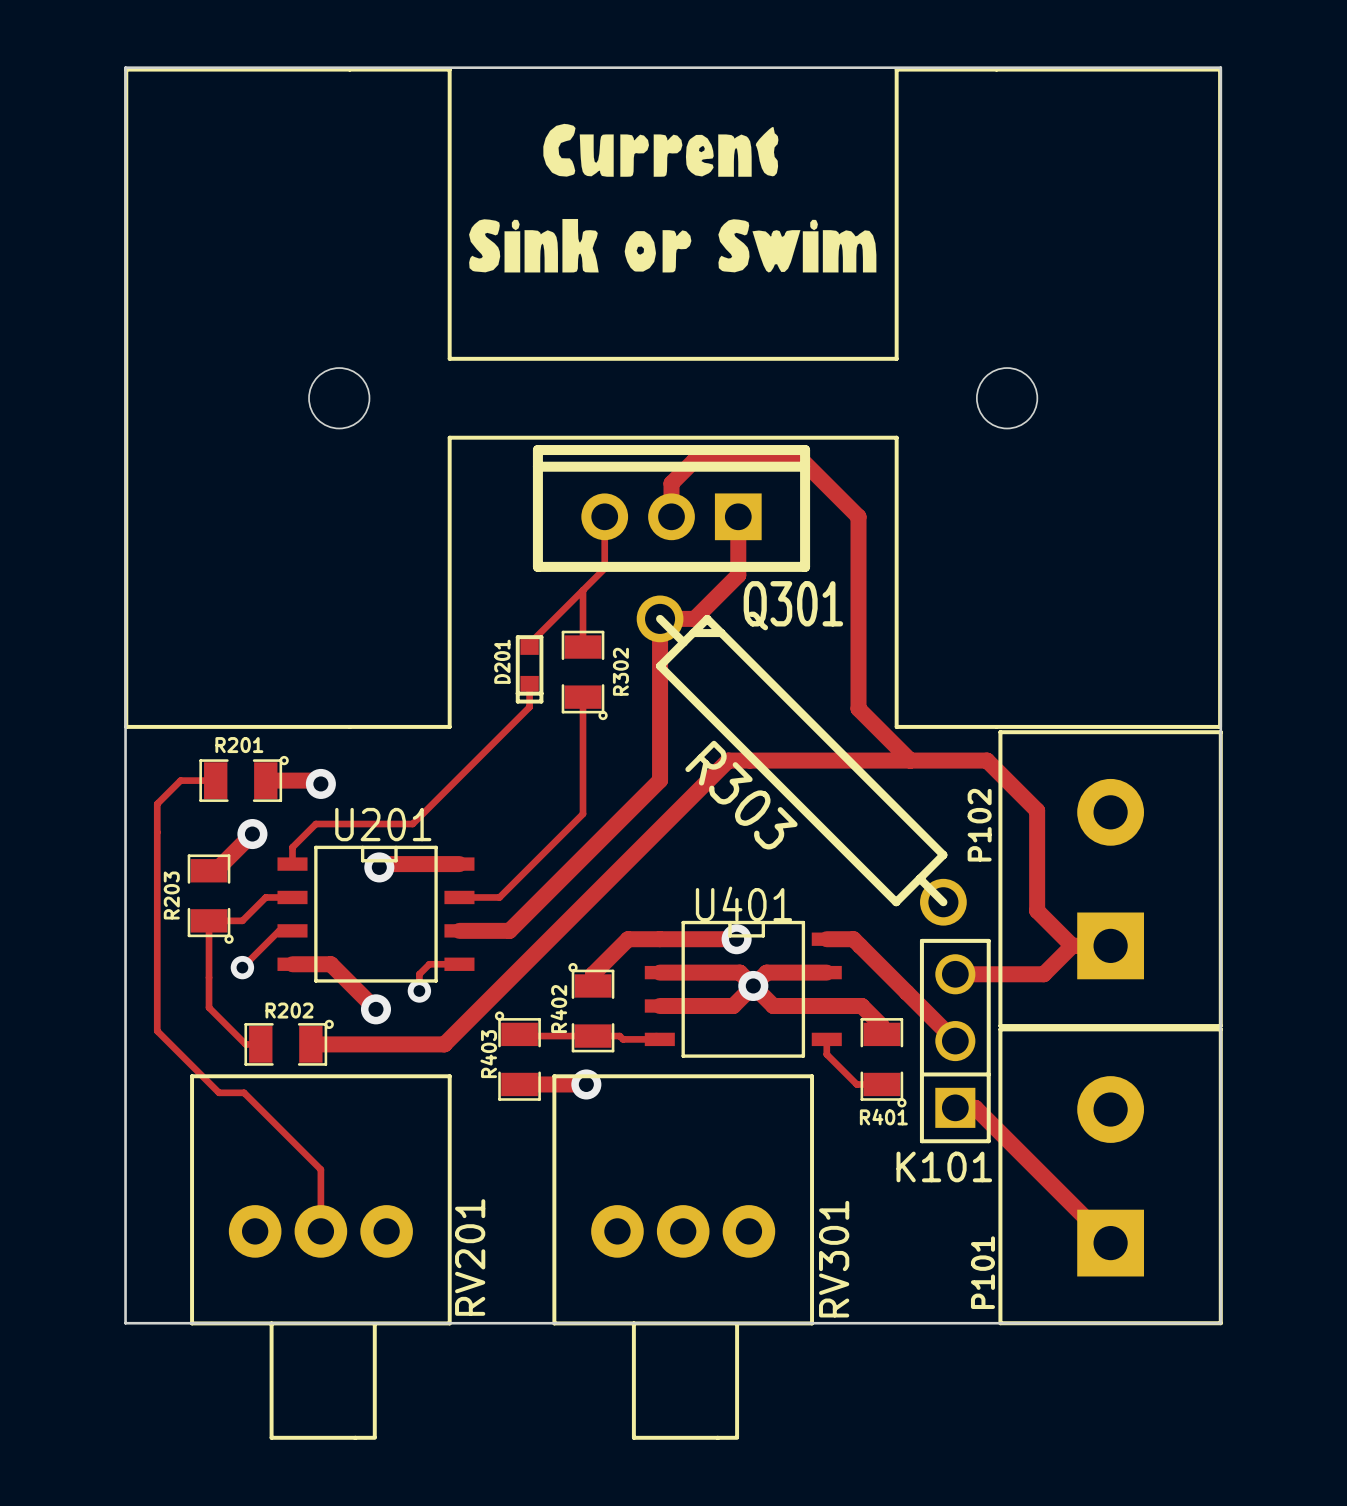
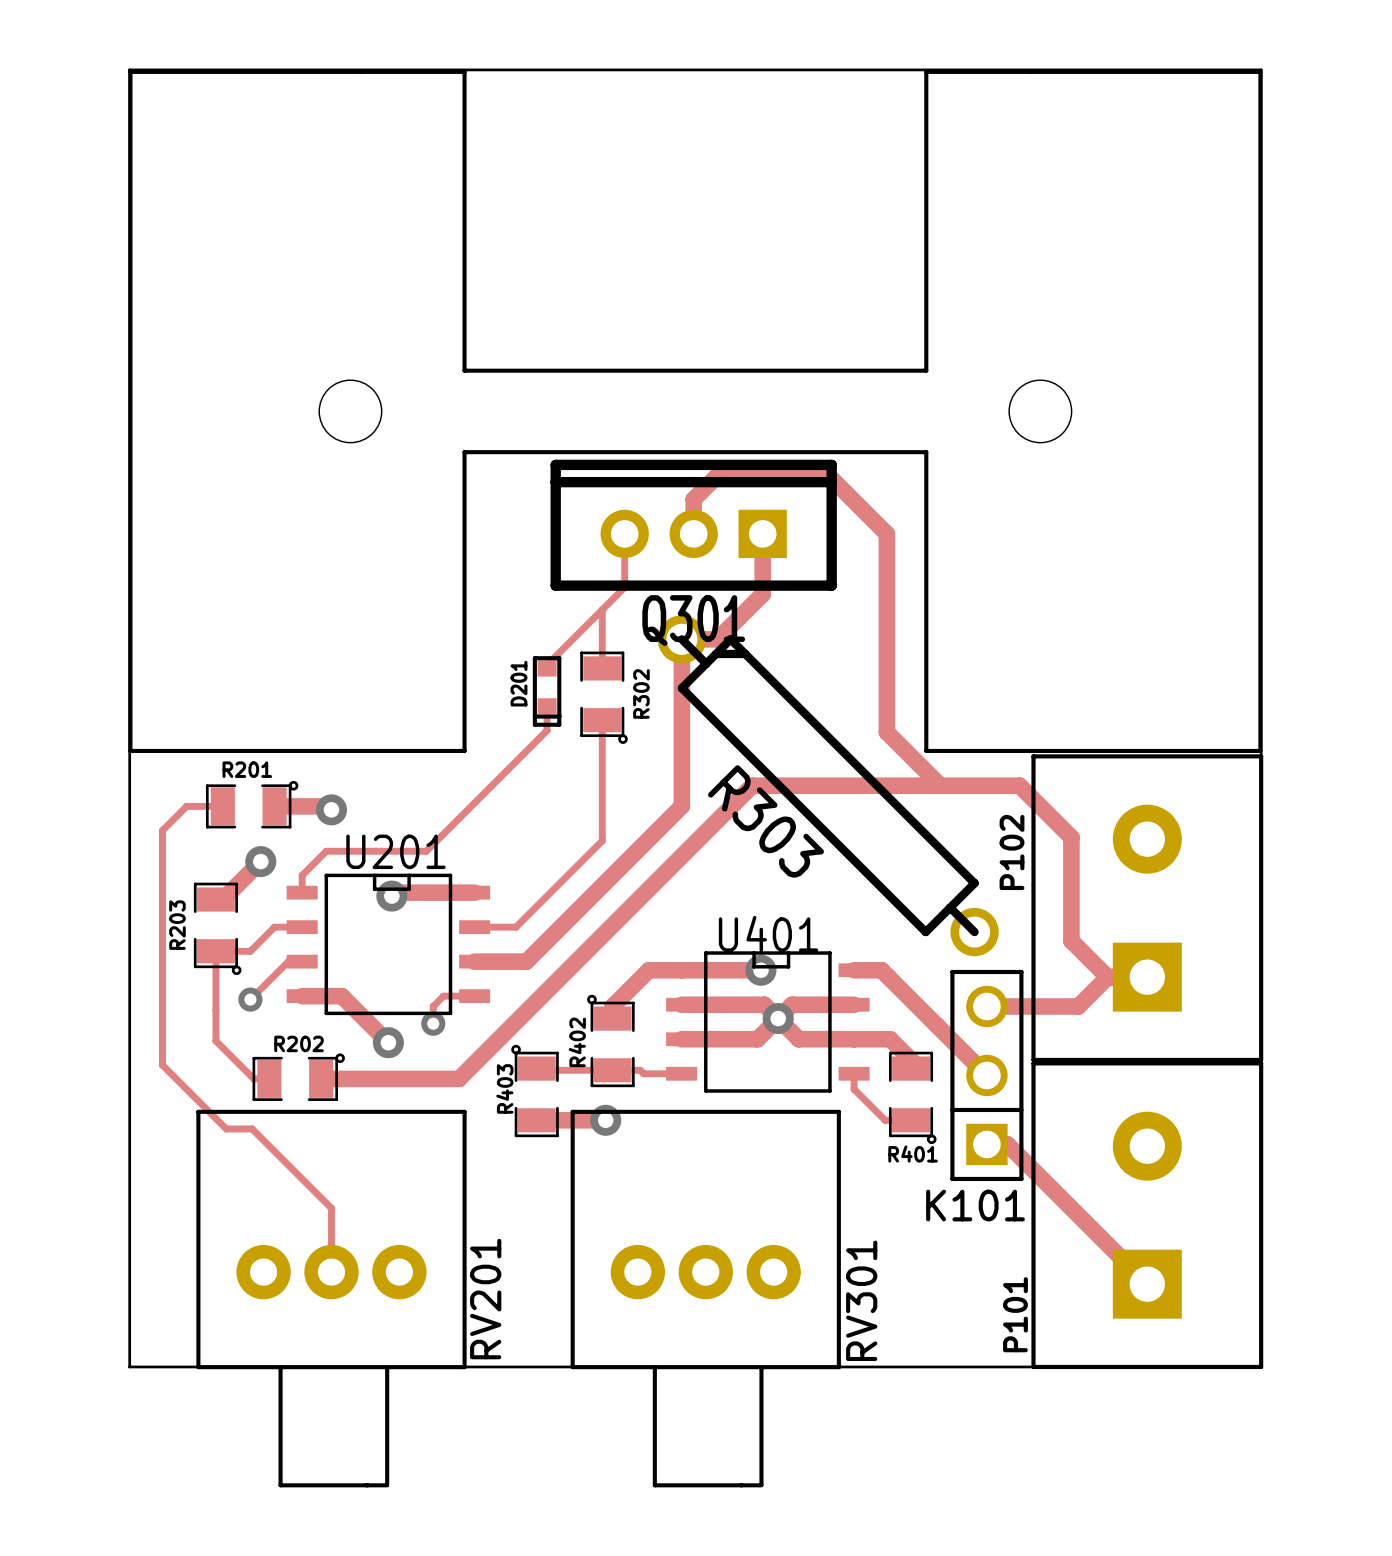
drawing: [469, 123, 877, 273] -> none
Q301 name position: Q301 (793, 605) -> Q301 (693, 620)

